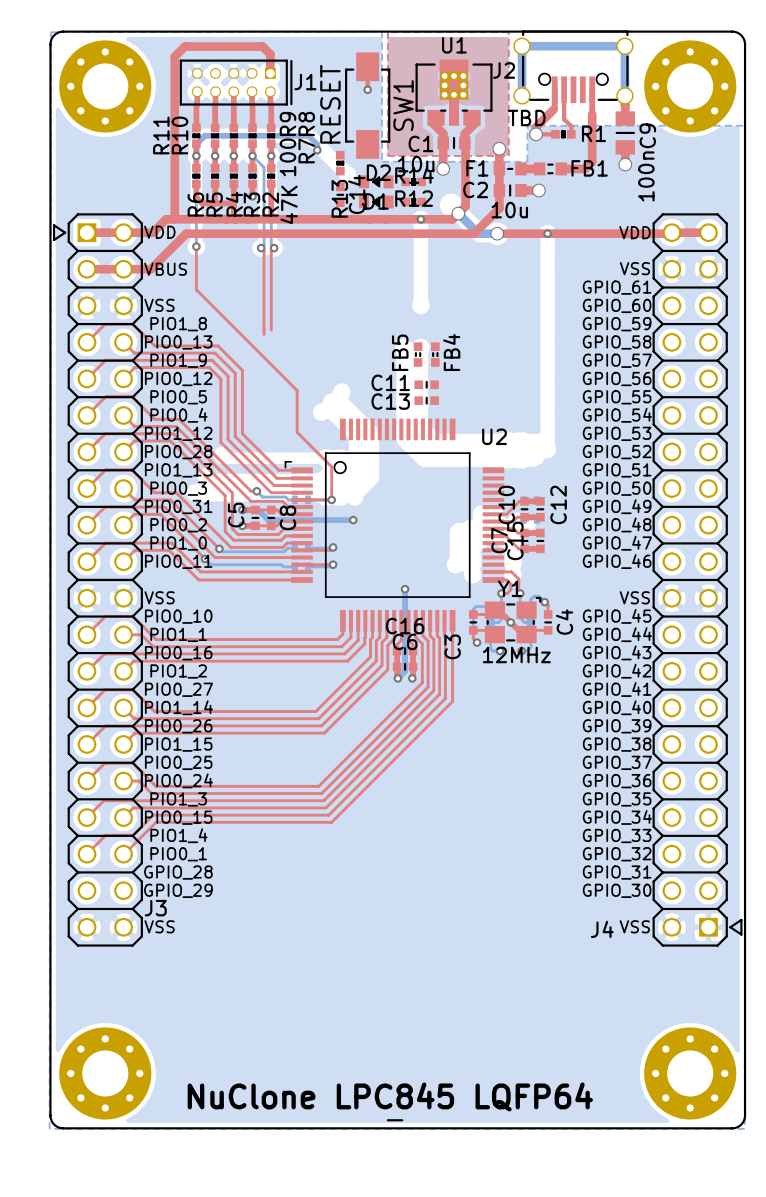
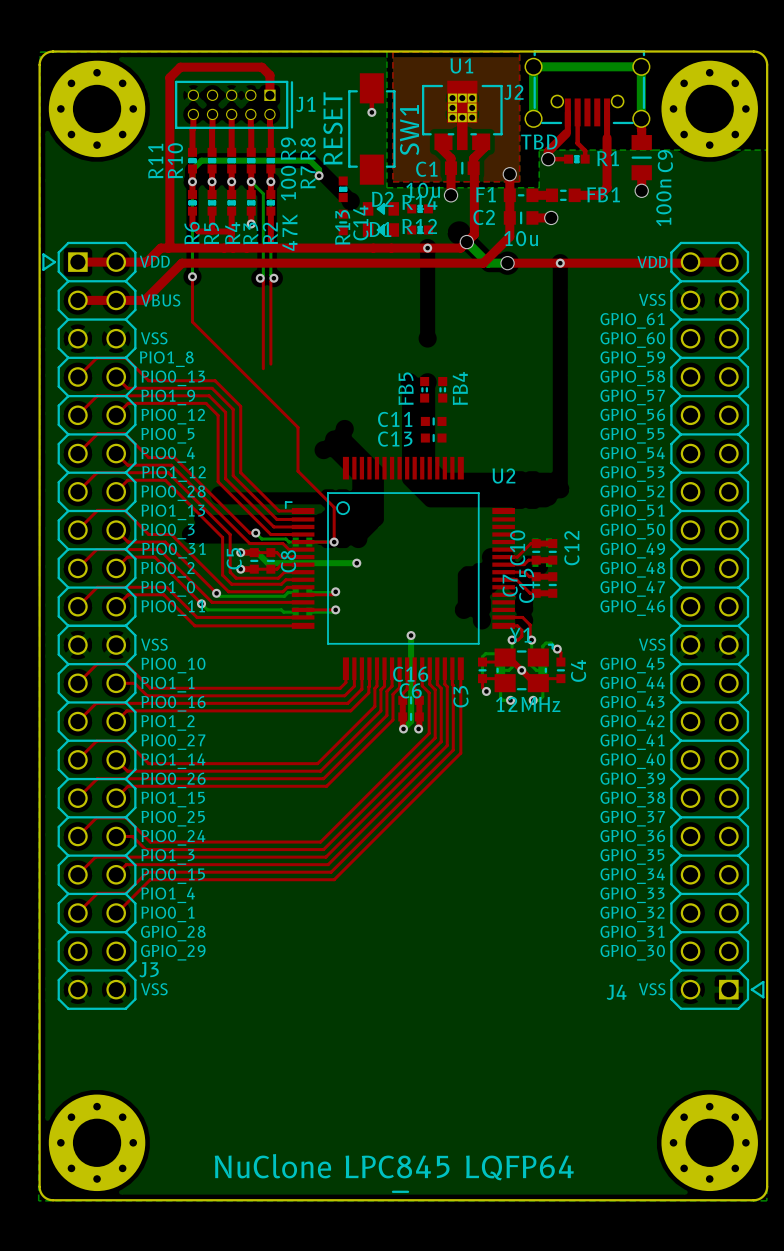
J3 footprint: [53, 213, 143, 947] -> [42, 241, 137, 1010]

